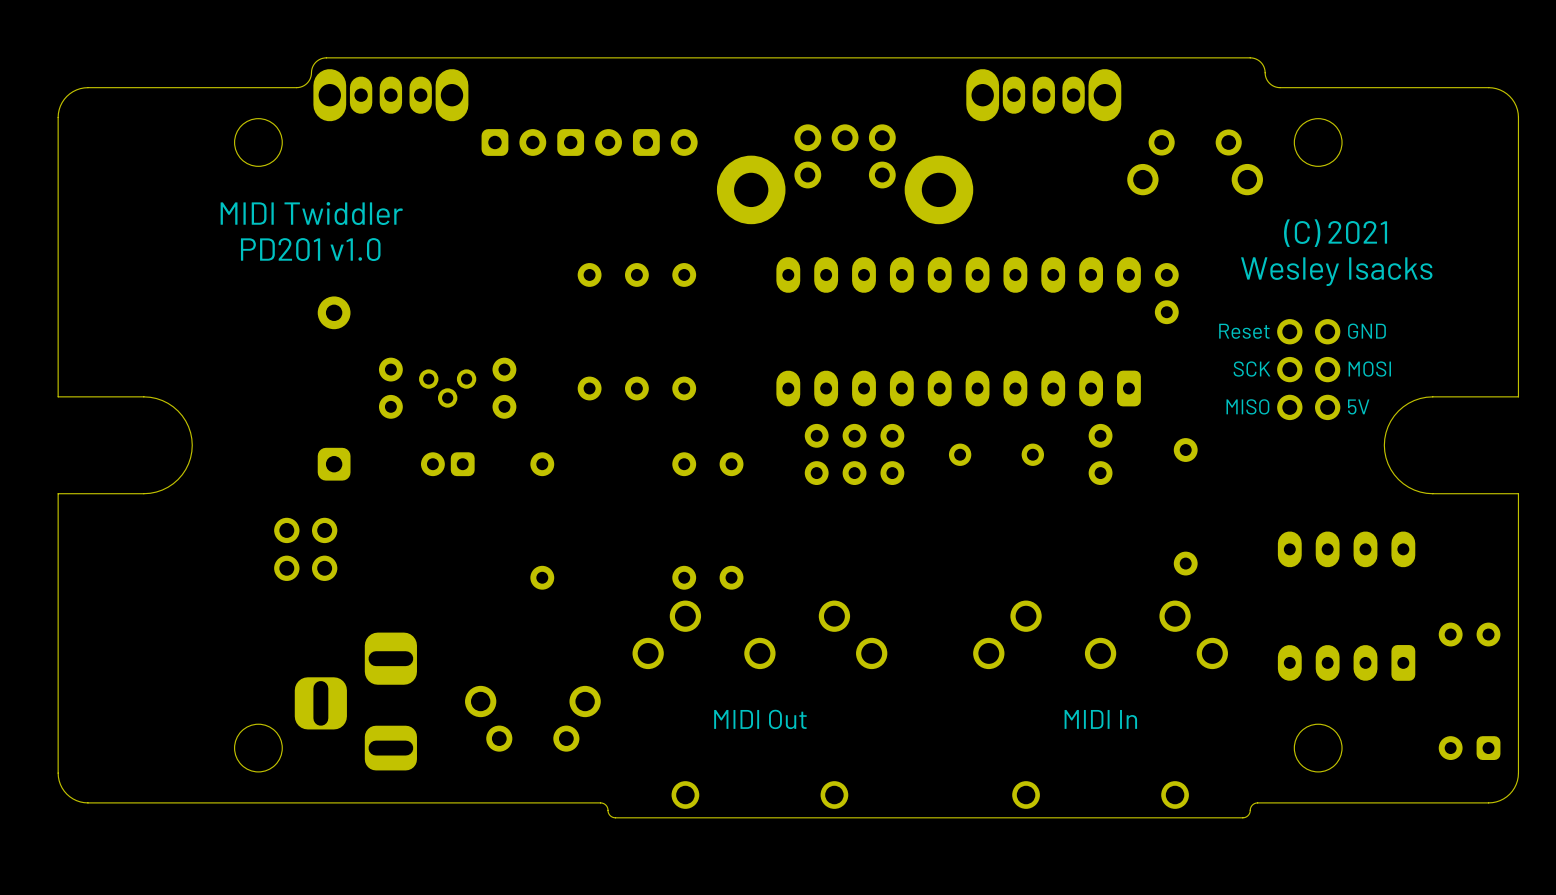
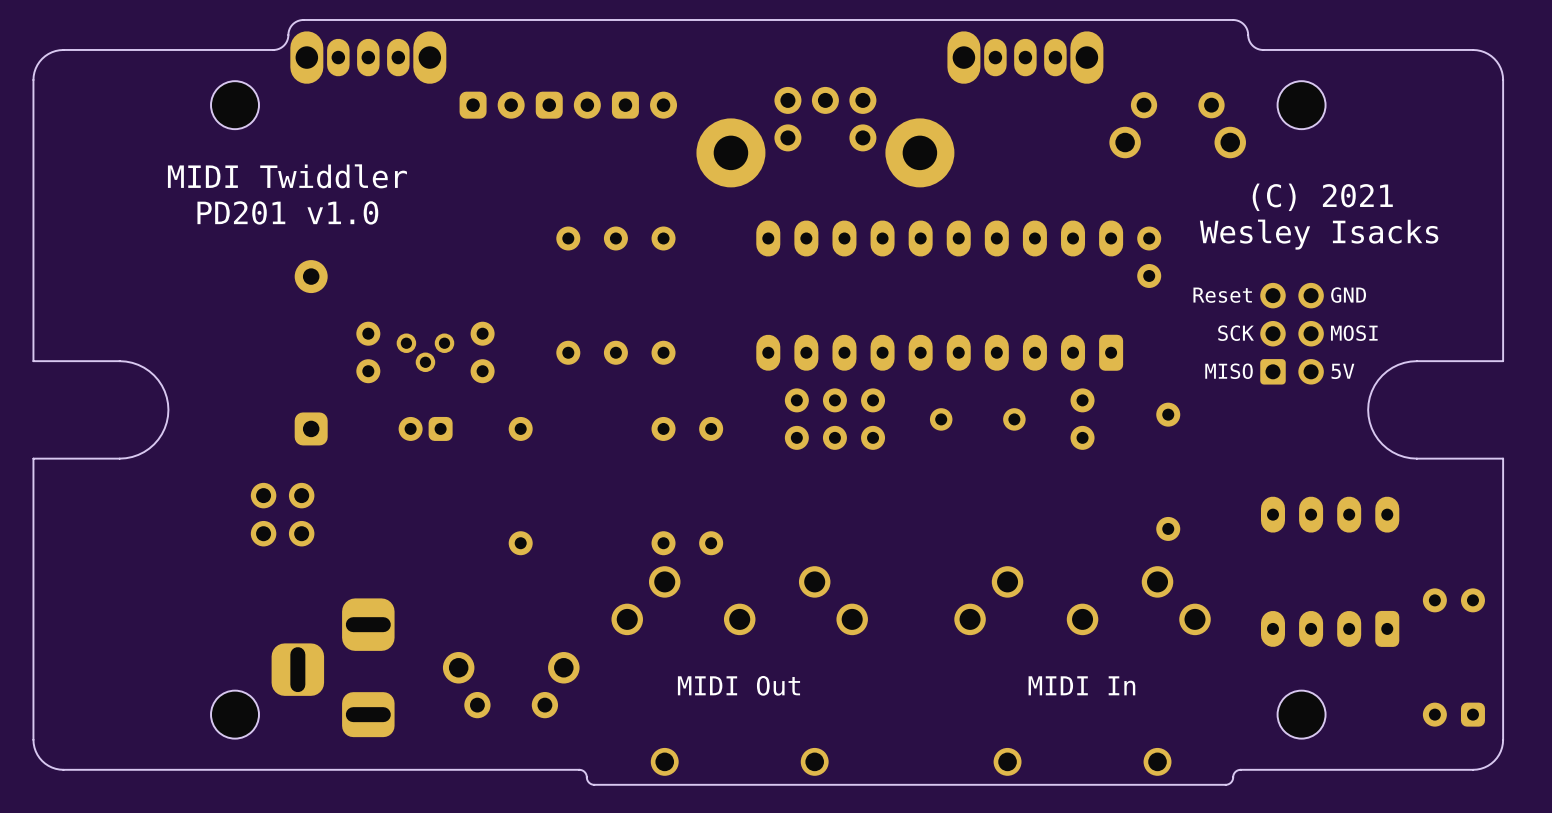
part footprint: [1277, 319, 1341, 421] -> [1260, 282, 1324, 385]

